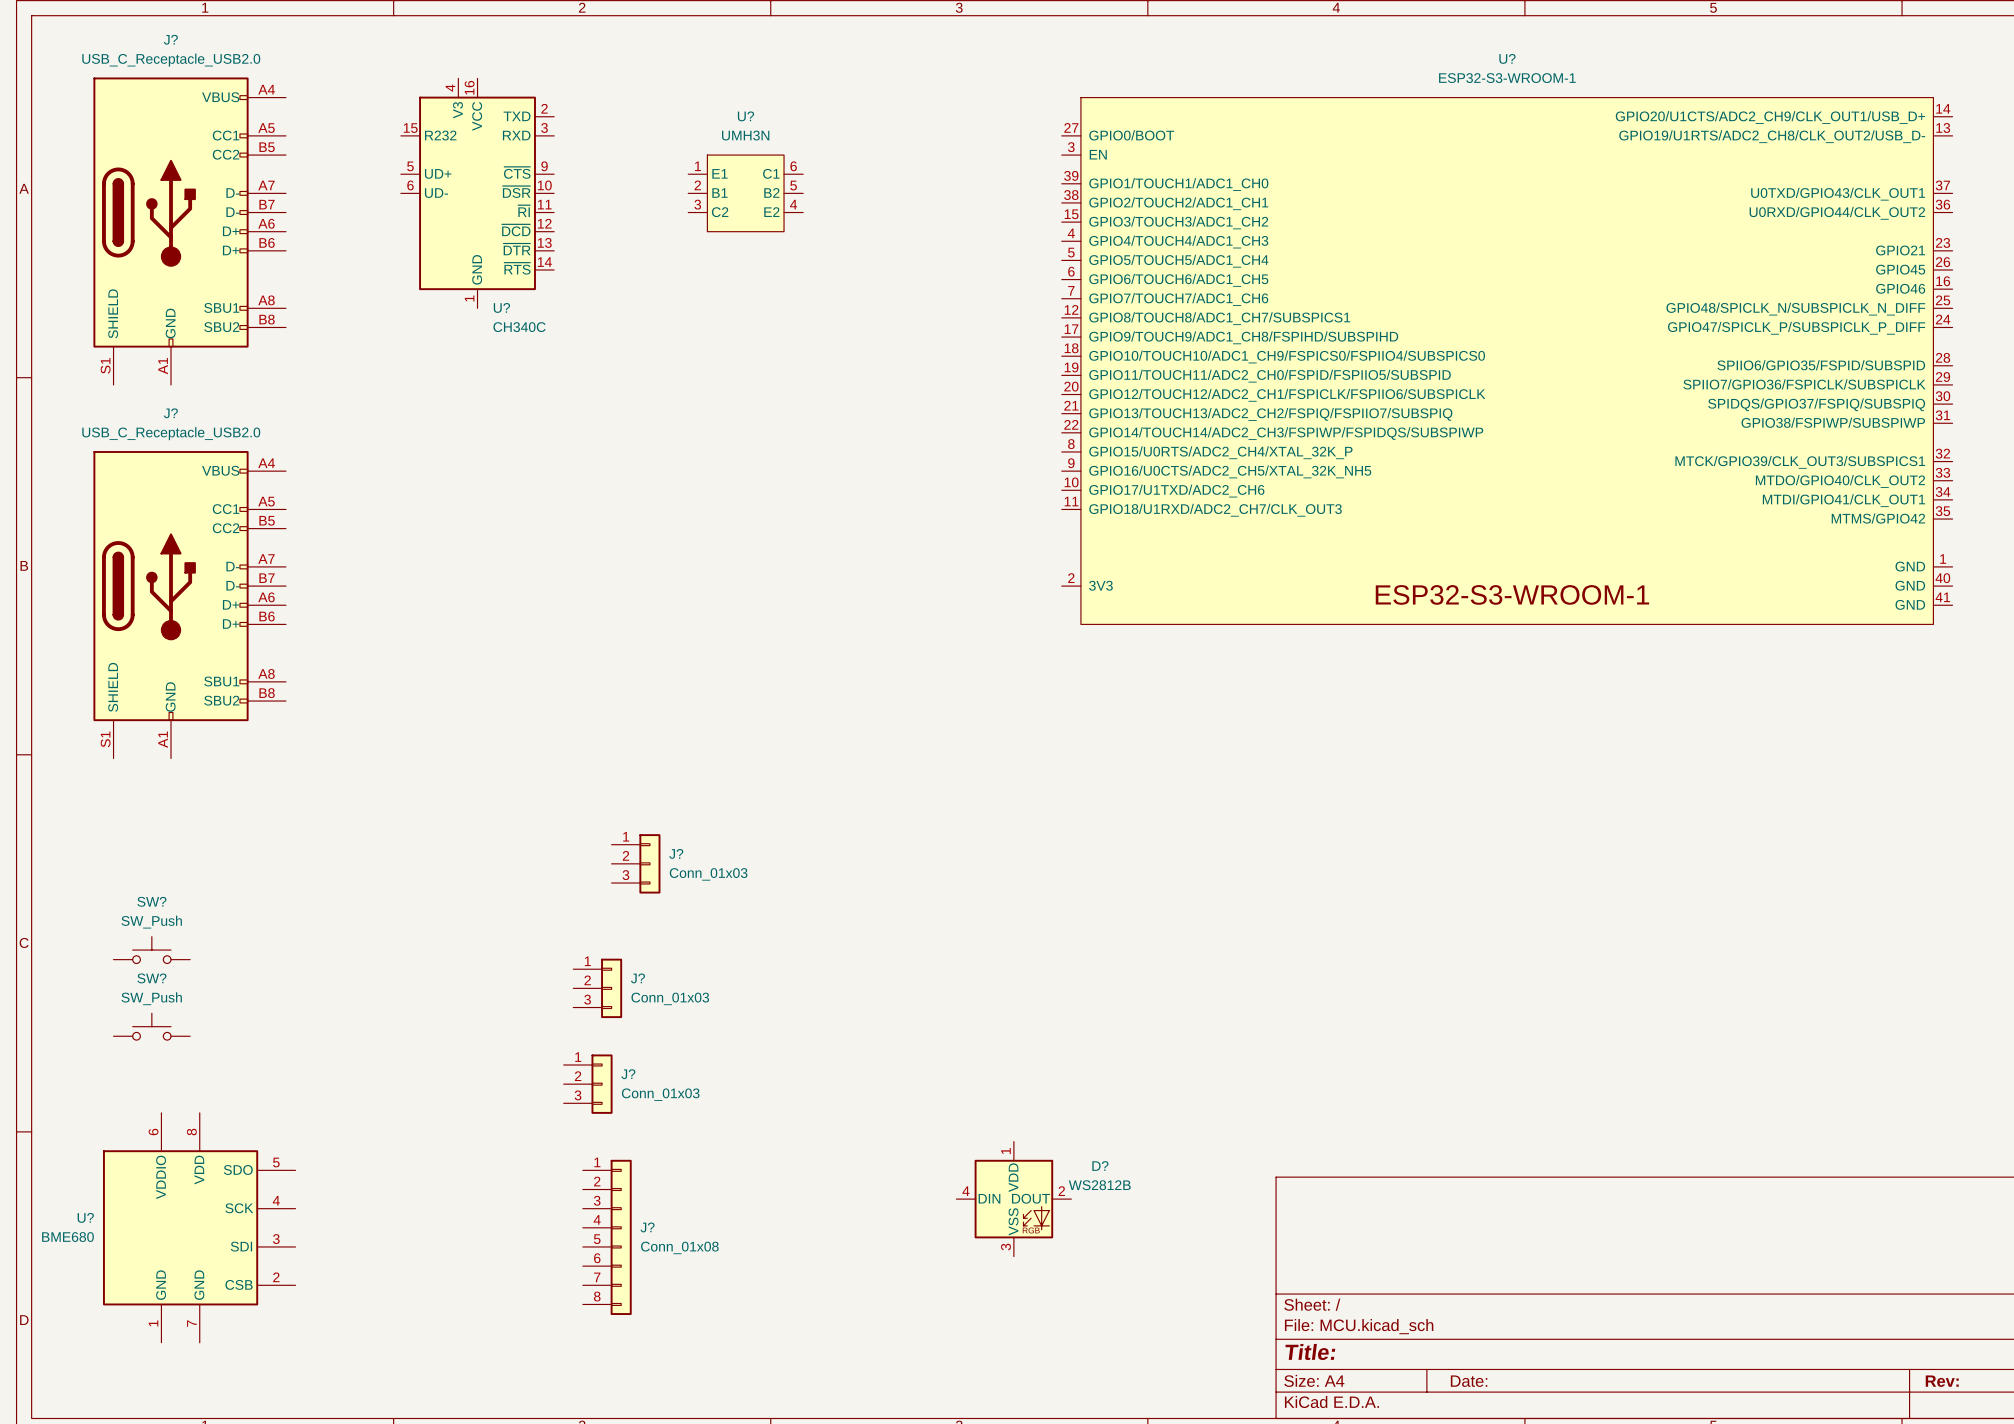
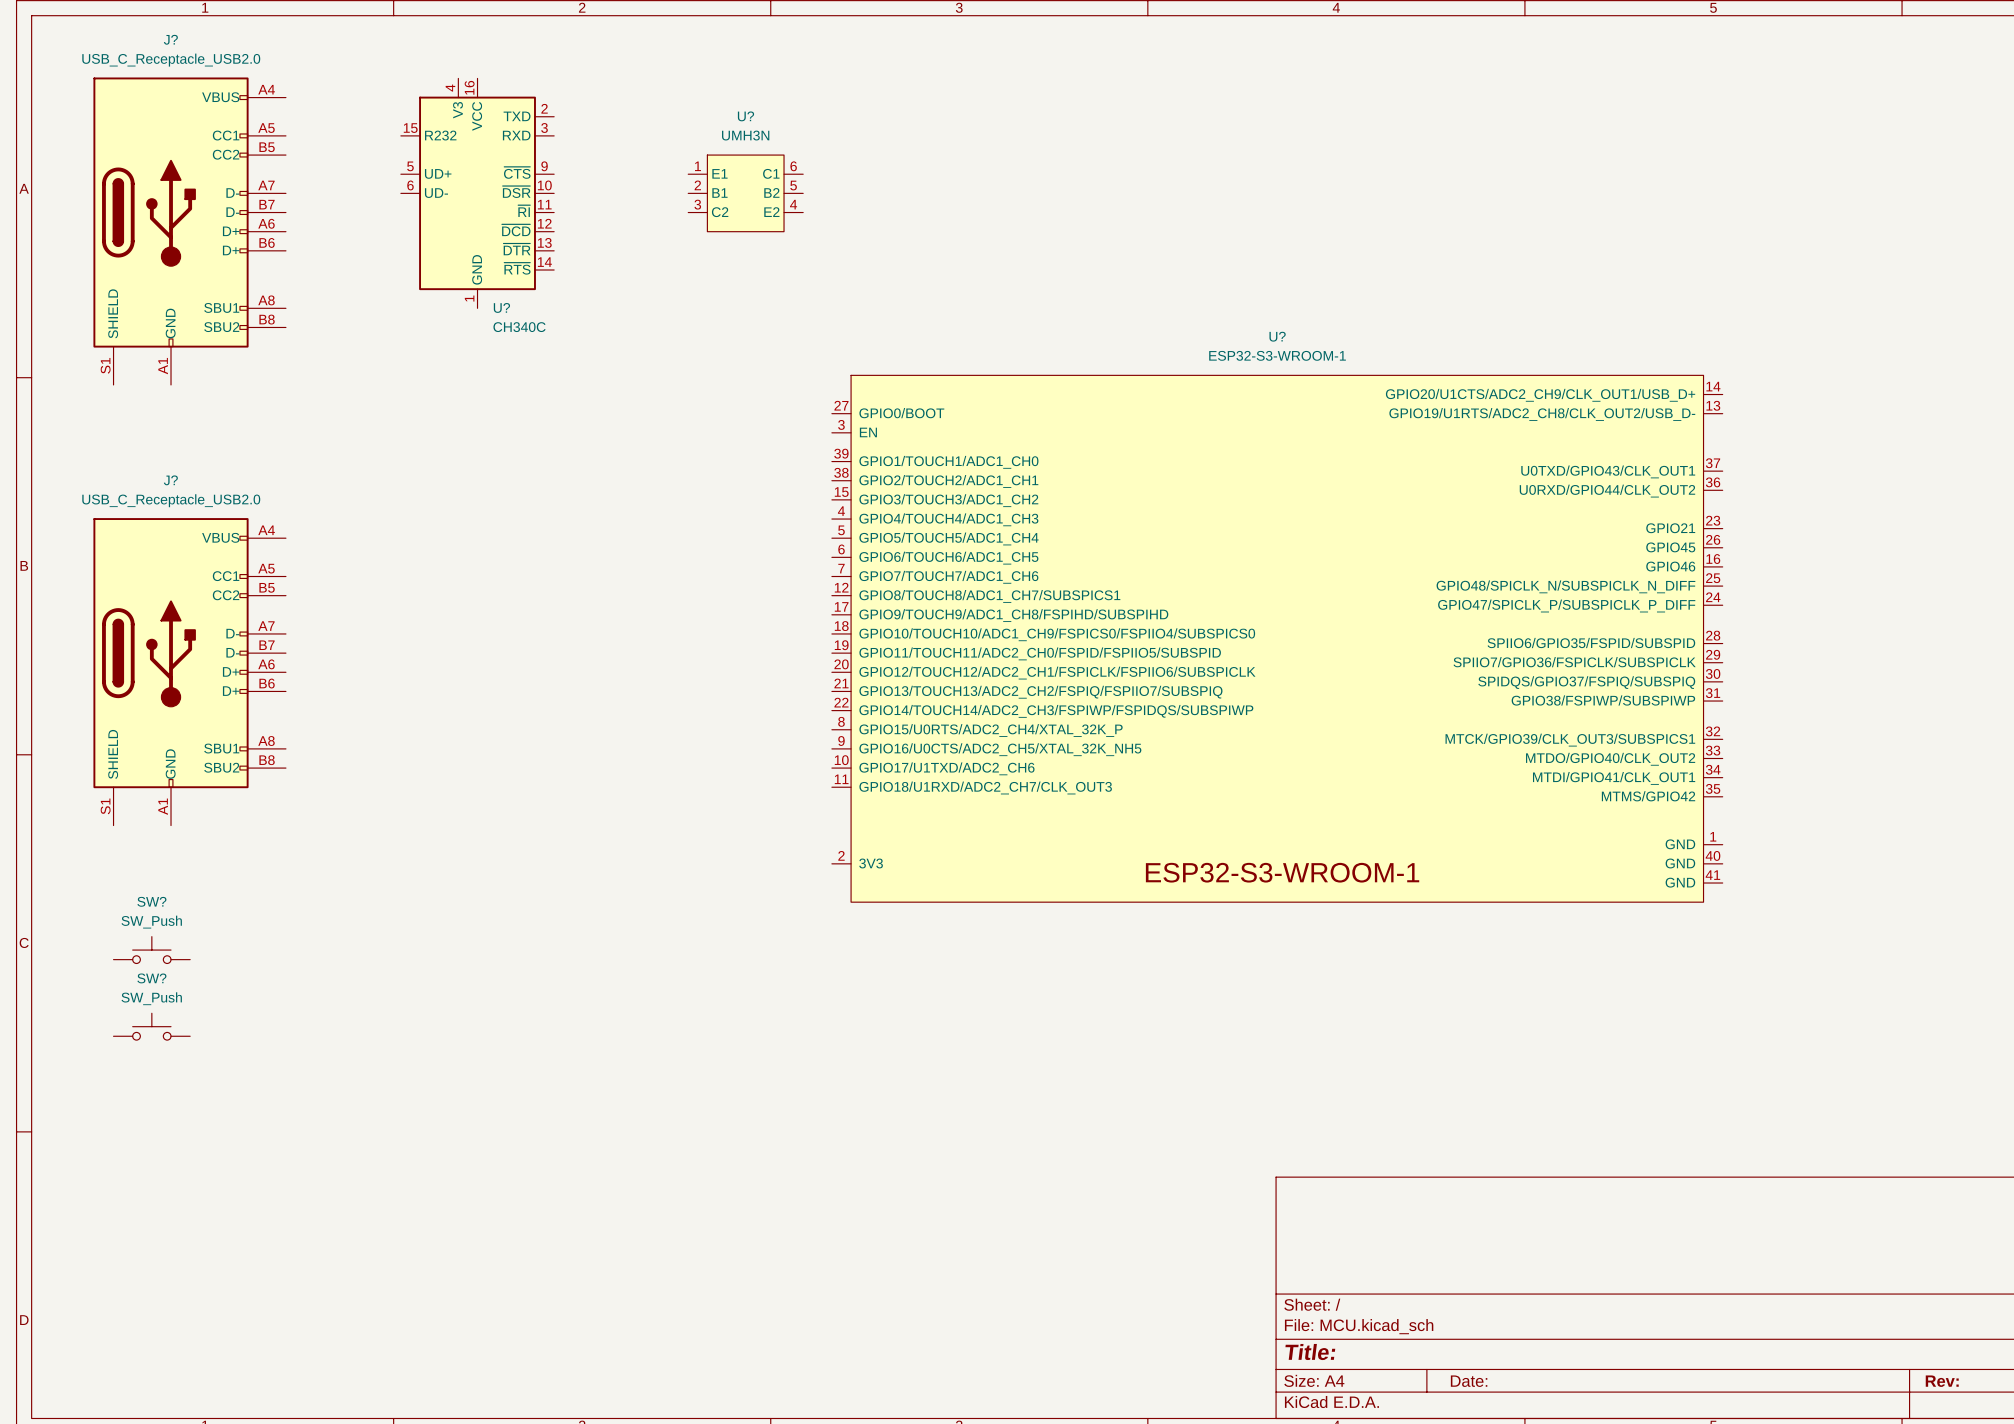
U?: ESP32-S3-WROOM-1 (1507, 360) -> none
J? position: (189, 604) -> (189, 671)
U?: none -> ESP32-S3-WROOM-1 (1277, 638)
J?: Conn_01x03 (636, 863) -> none
J?: Conn_01x03 (597, 988) -> none
J?: Conn_01x03 (588, 1084) -> none
D?: WS2812B (1013, 1199) -> none
U?: BME680 (199, 1227) -> none
J?: Conn_01x08 (607, 1237) -> none

